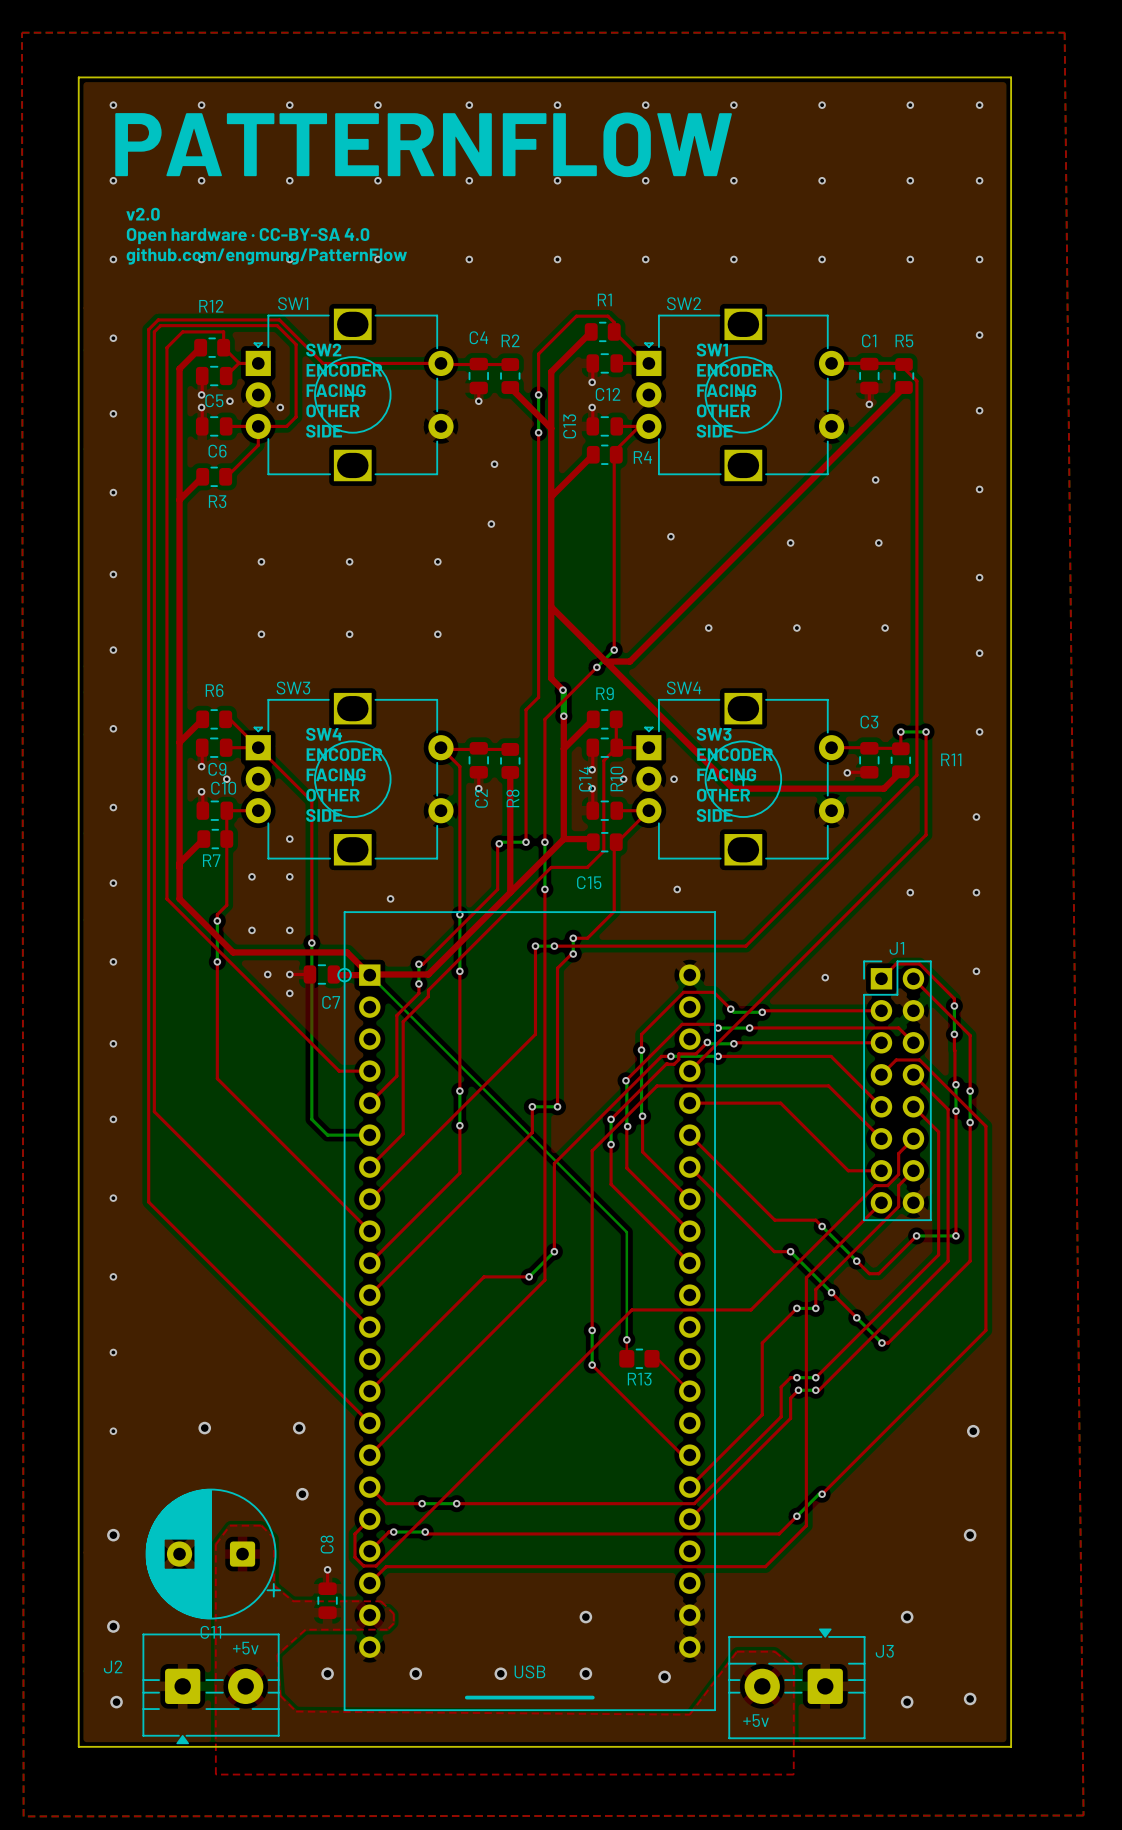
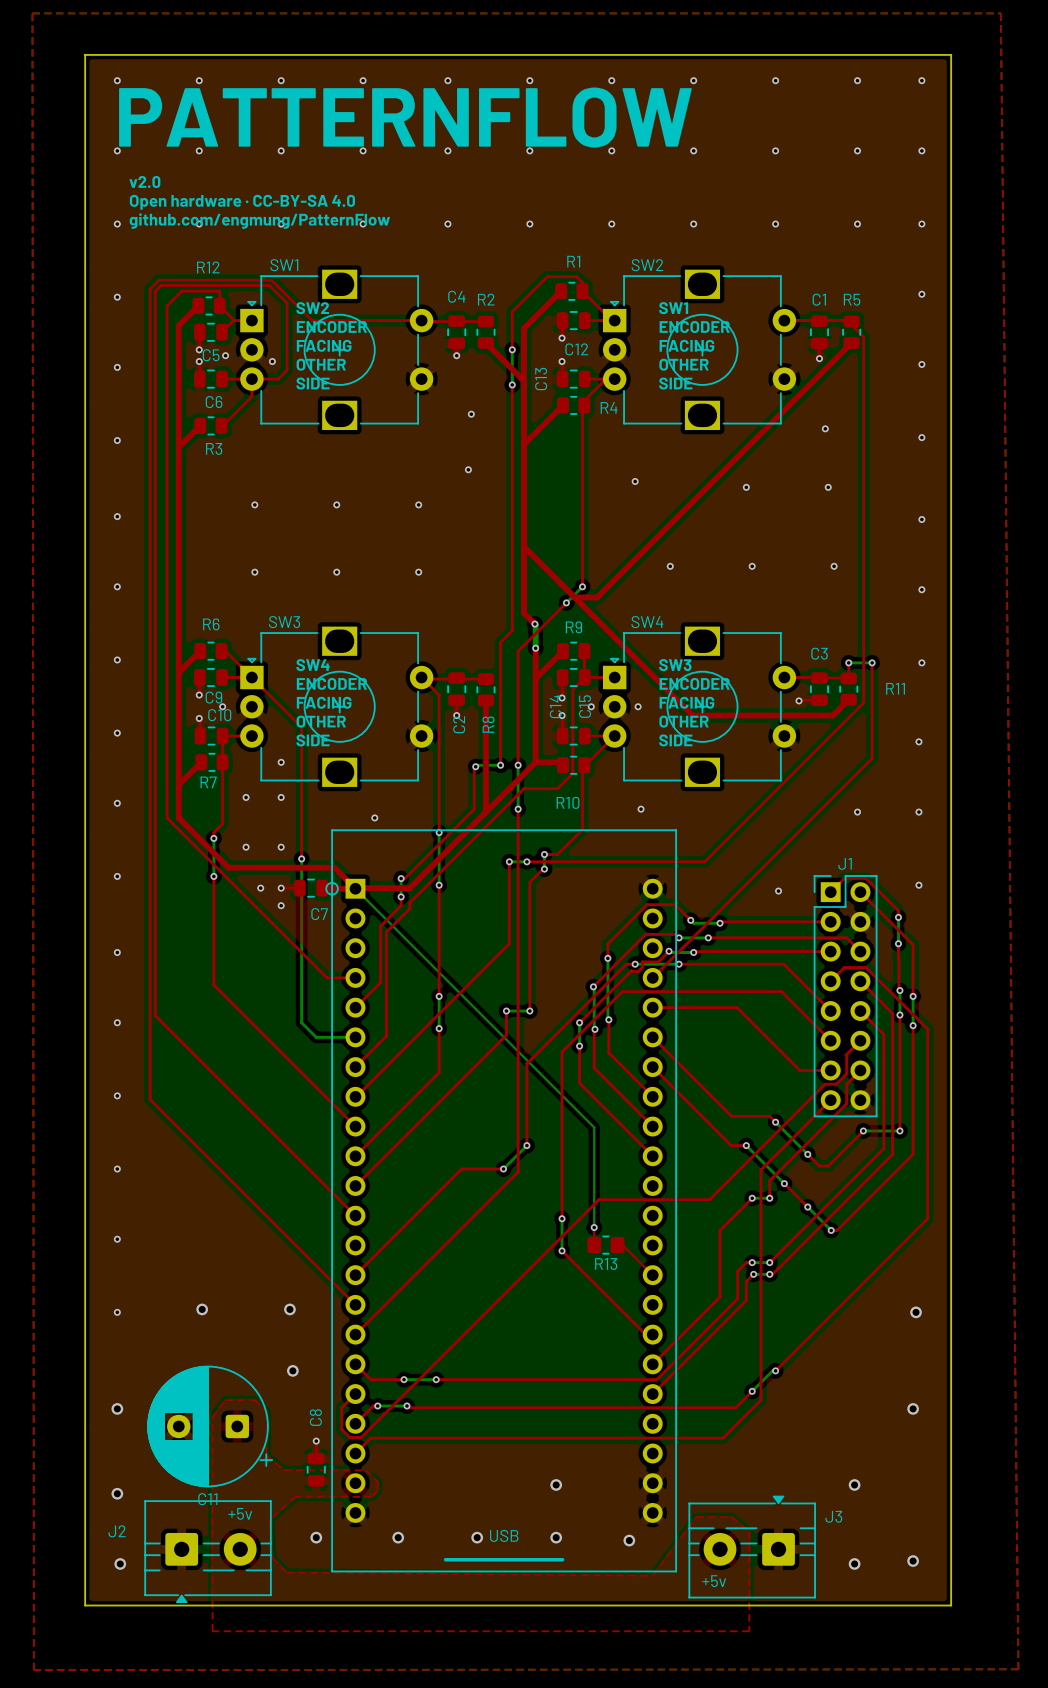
R10 name rotation: 0° (616, 779) -> 90° clockwise (568, 802)
R10 name position: R10 (616, 779) -> R10 (568, 802)
C15 name rotation: 0° (589, 882) -> 90° counterclockwise (585, 706)
C15 name position: C15 (589, 882) -> C15 (585, 706)

